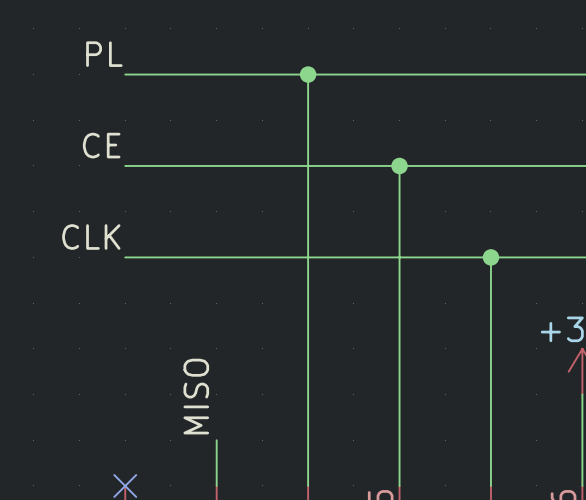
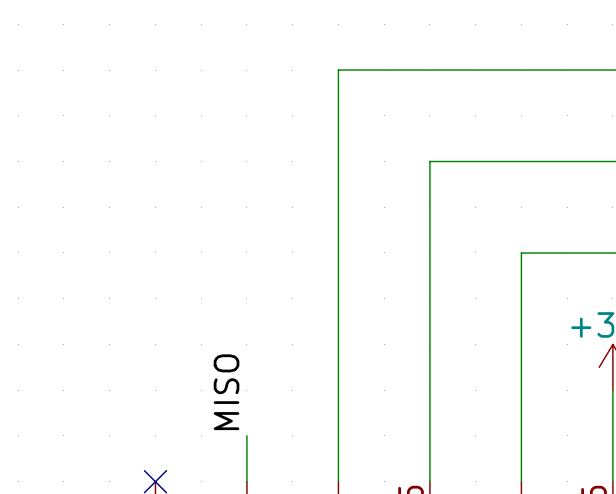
label: PL (104, 54) -> none
wire: (125, 74) (308, 74) -> none
junction: (308, 74) -> none
label: CE (101, 145) -> none
wire: (125, 165) (399, 165) -> none
junction: (399, 165) -> none
label: CLK (91, 237) -> none
wire: (125, 257) (490, 257) -> none
junction: (490, 257) -> none

